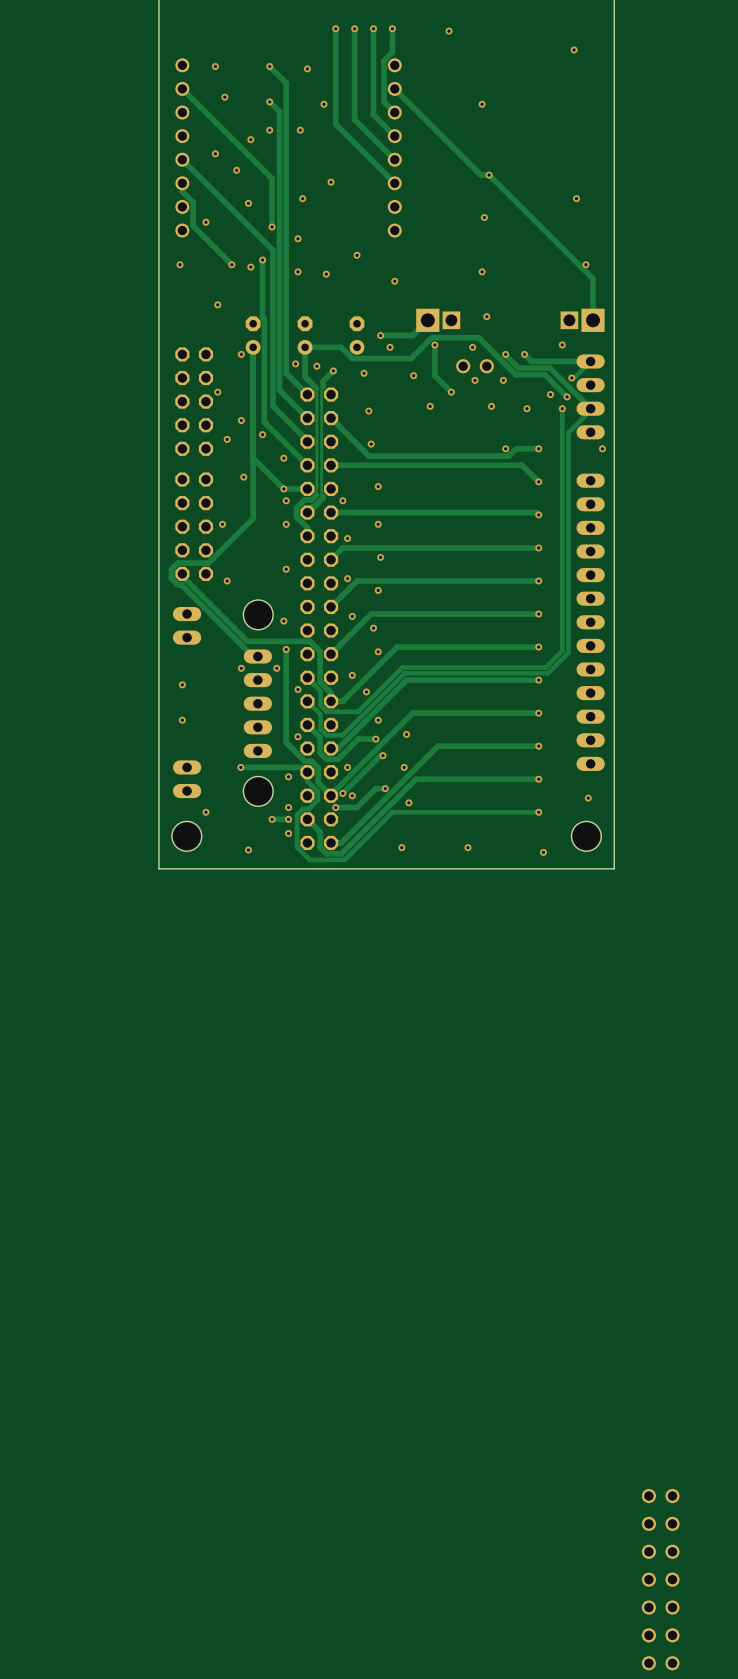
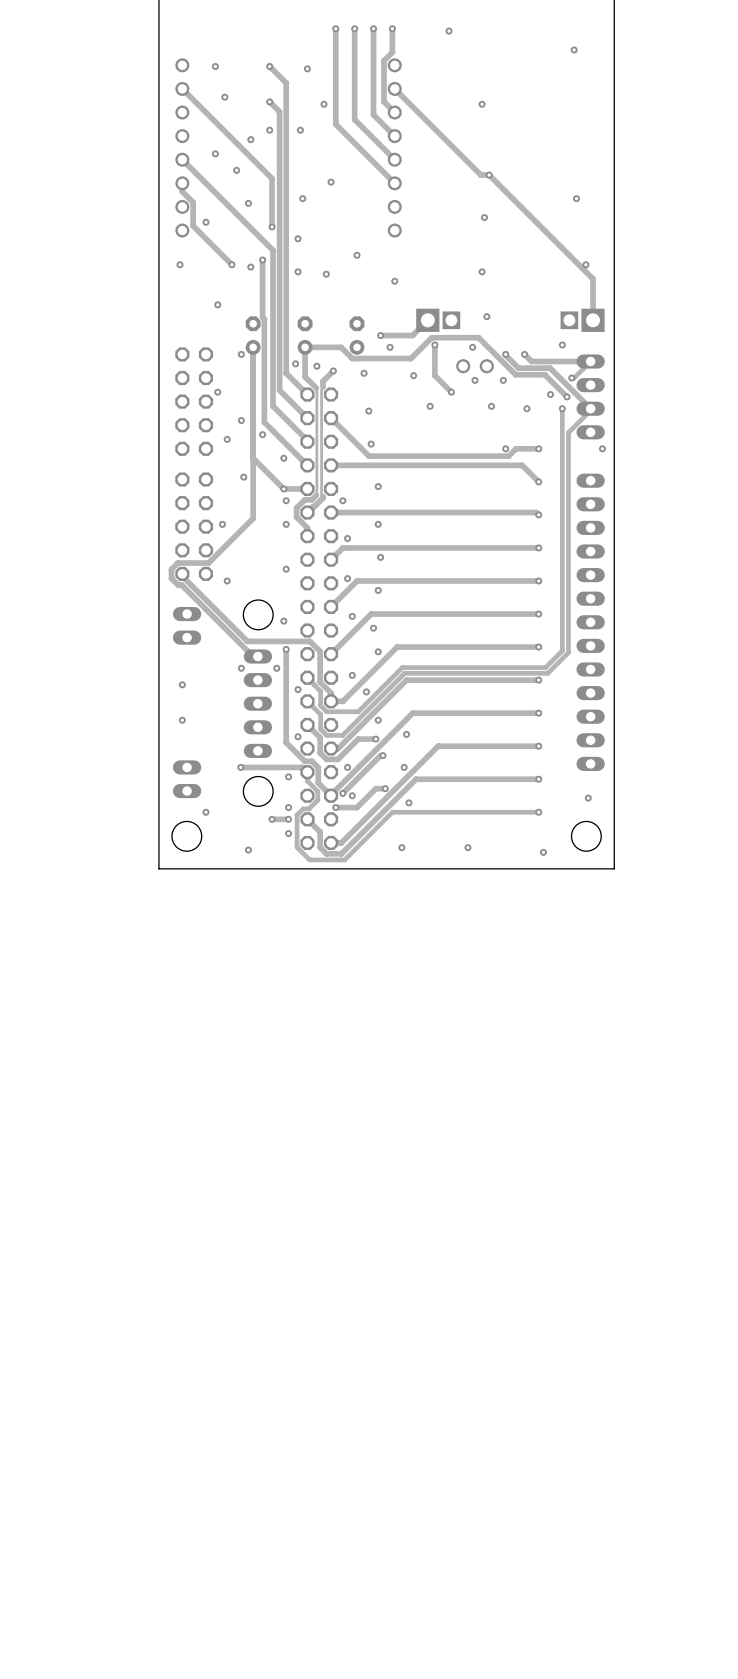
part: (660, 1496) -> none
part: (660, 1523) -> none
part: (660, 1551) -> none
part: (660, 1579) -> none
part: (660, 1607) -> none
part: (660, 1635) -> none
part: (660, 1663) -> none

